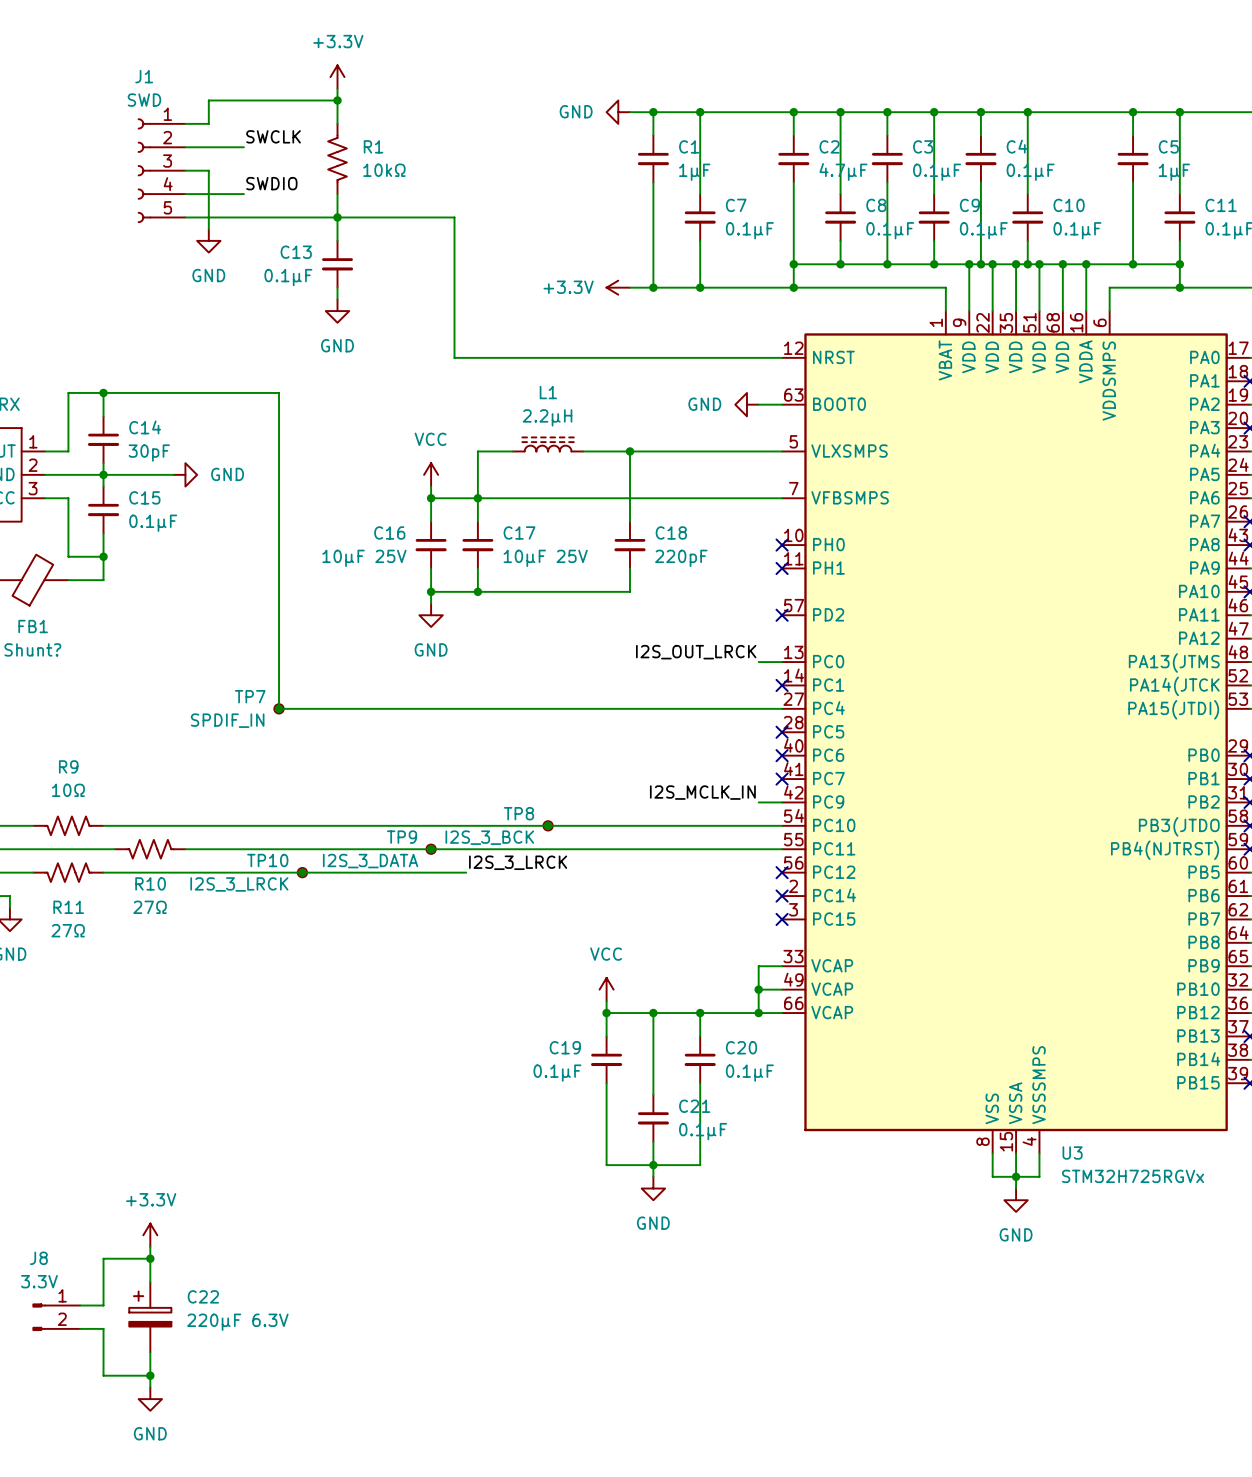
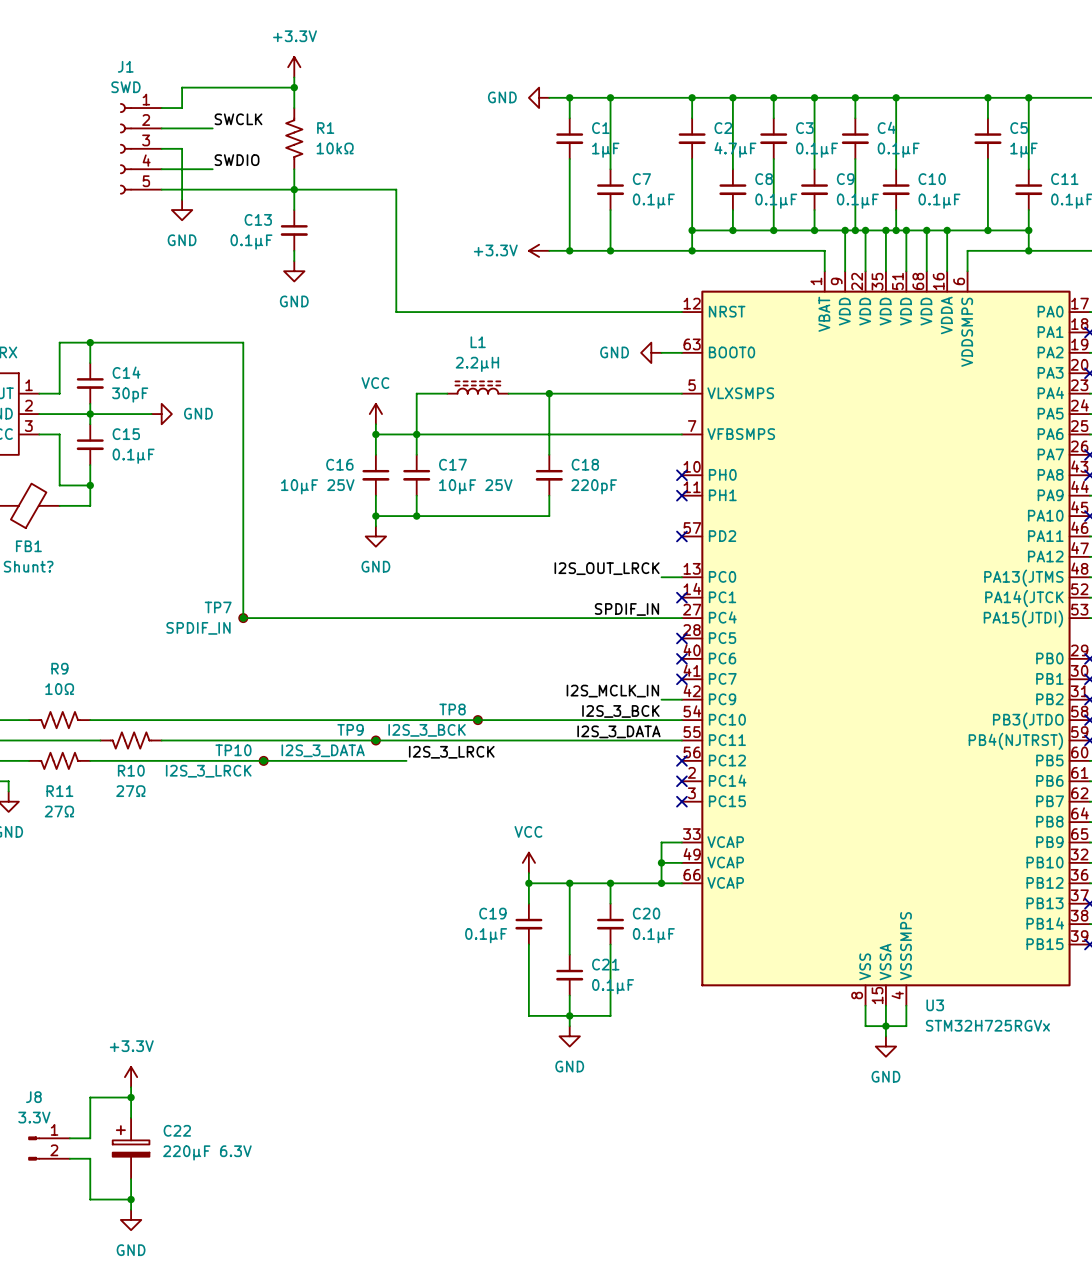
label: none -> SPDIF_IN (626, 609)
label: none -> I2S_3_BCK (620, 711)
label: none -> I2S_3_DATA (618, 731)

